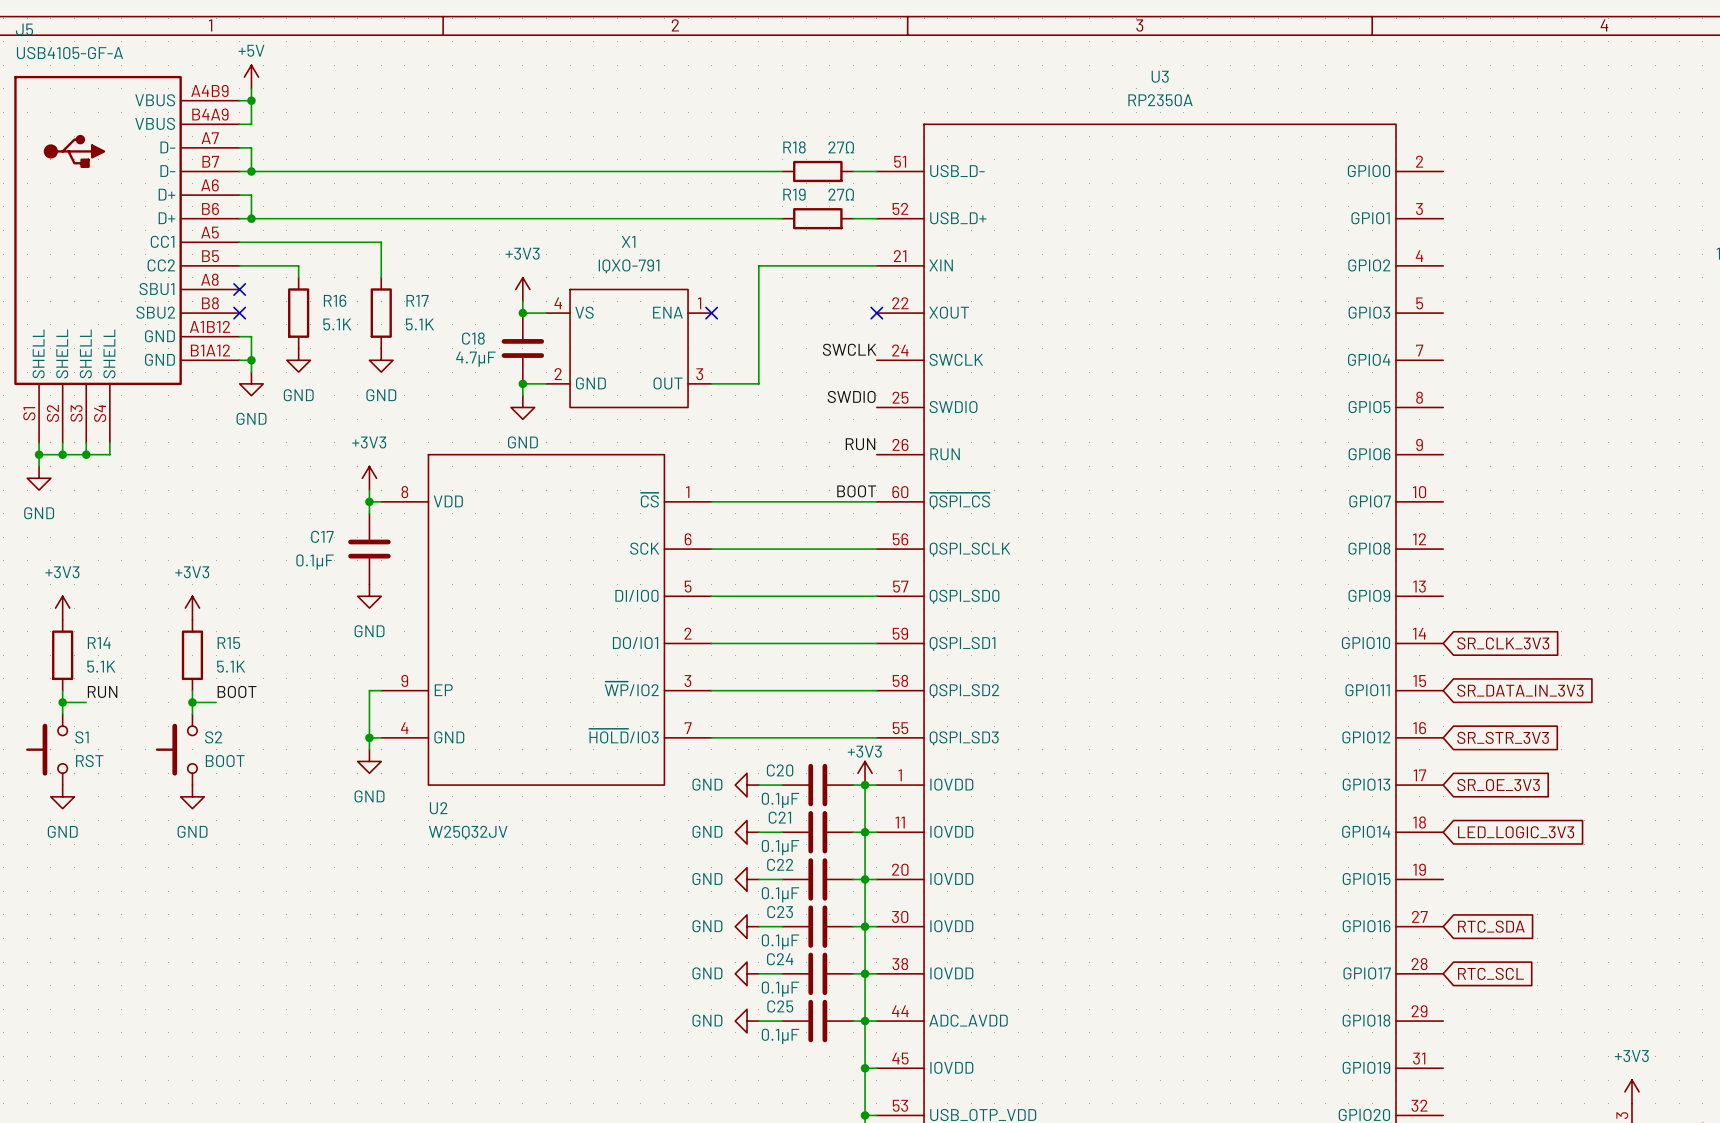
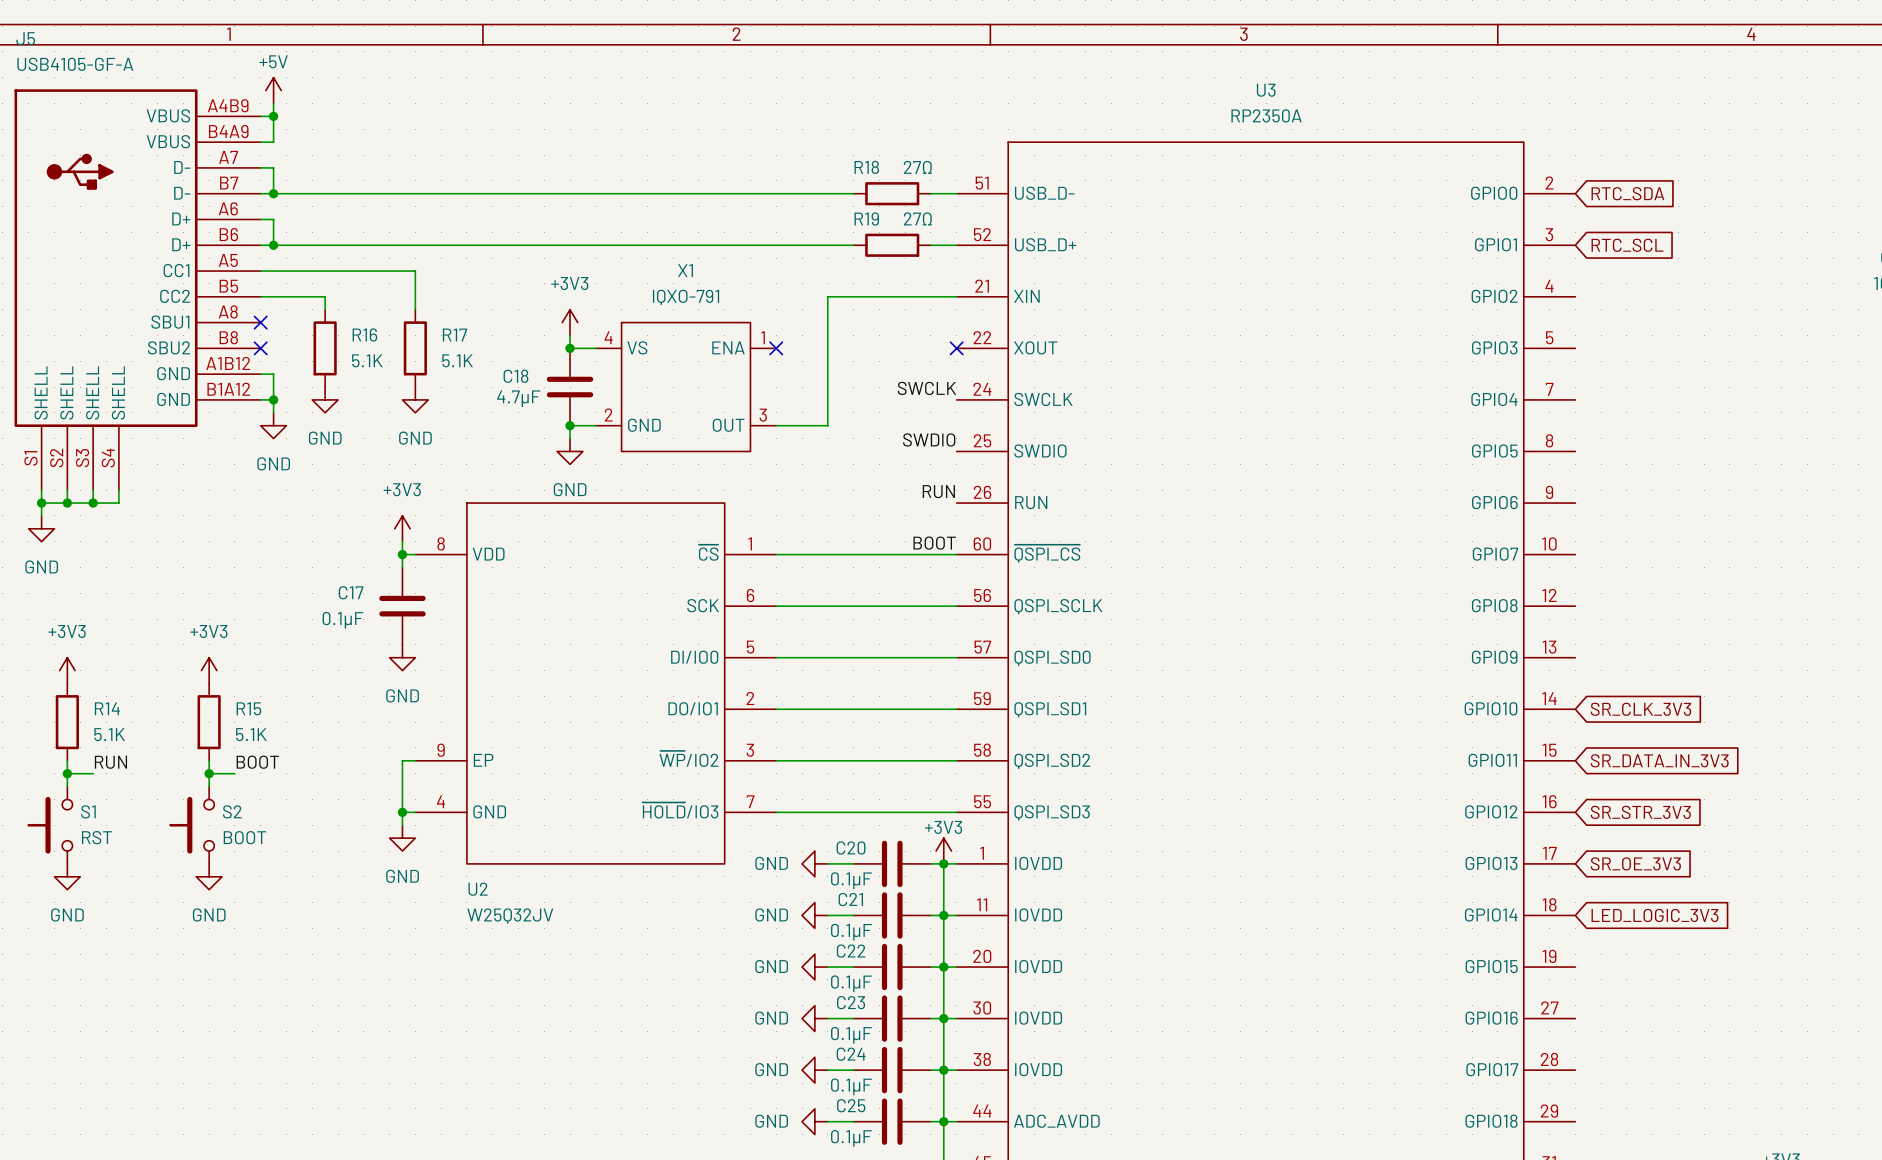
global label: none -> RTC_SDA (1627, 193)
global label: none -> RTC_SCL (1627, 245)
global label: RTC_SDA (1491, 926) -> none
global label: RTC_SCL (1490, 973) -> none

